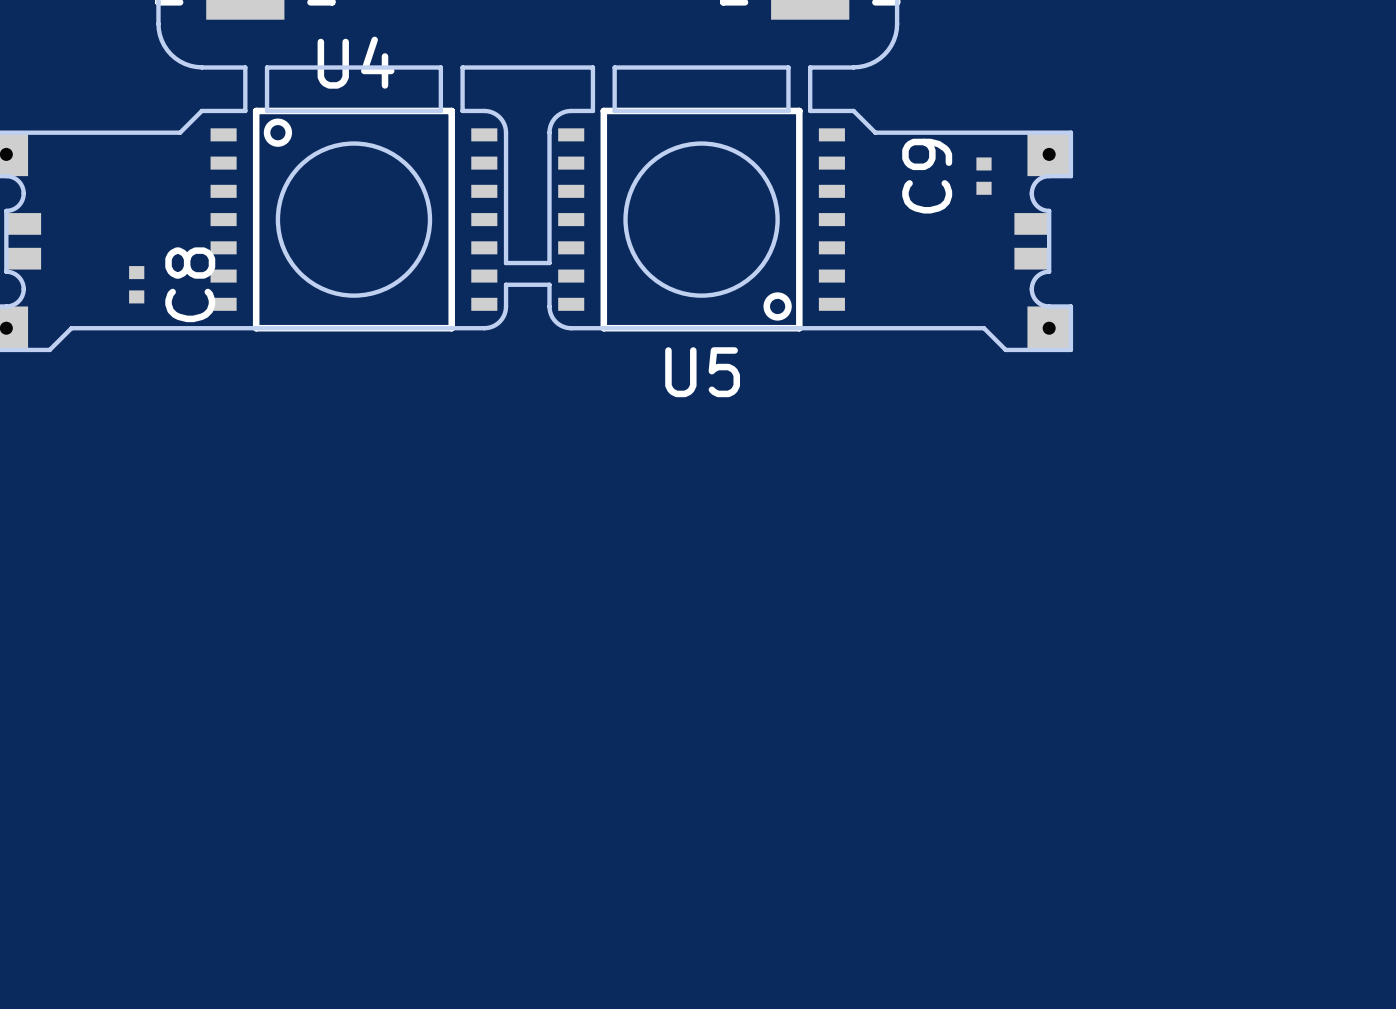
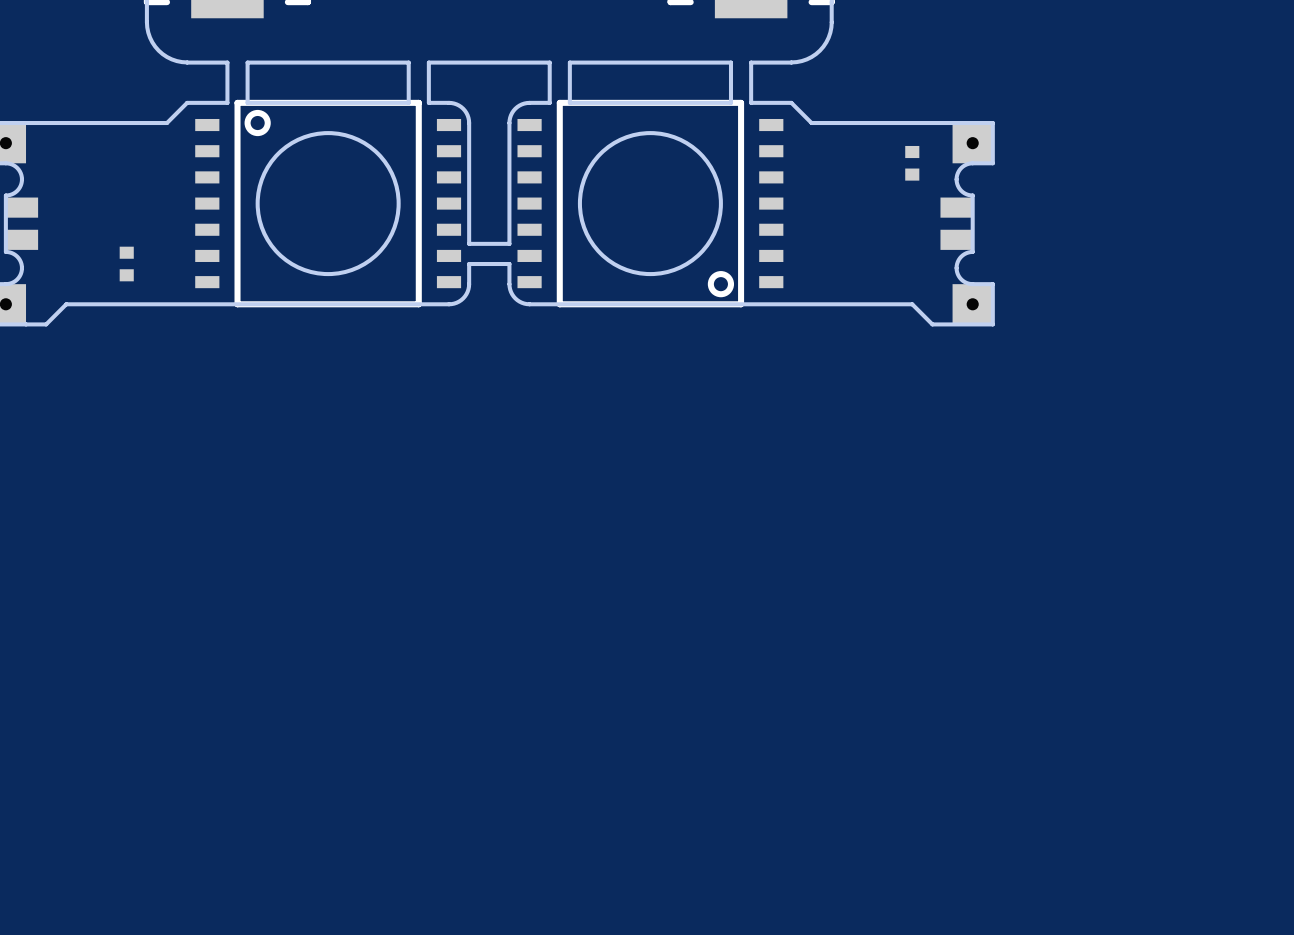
U4 name: U4 (356, 62) -> none
C9 name: C9 (927, 176) -> none
C8 name: C8 (190, 284) -> none
U5 name: U5 (702, 372) -> none

